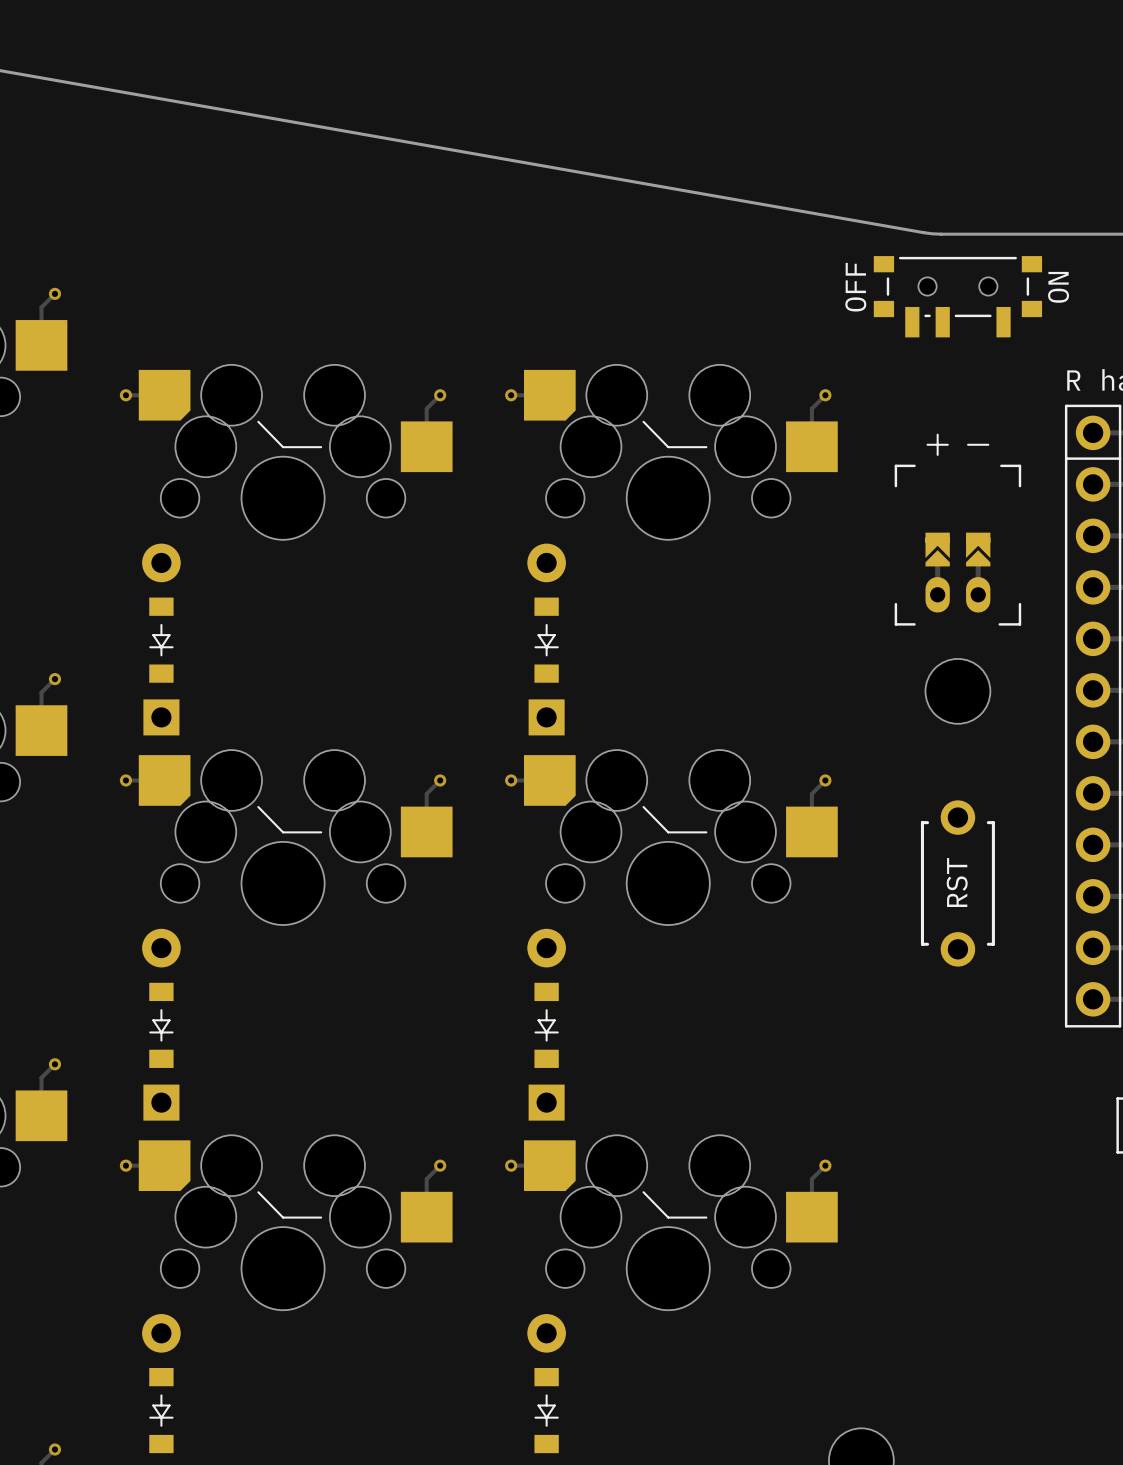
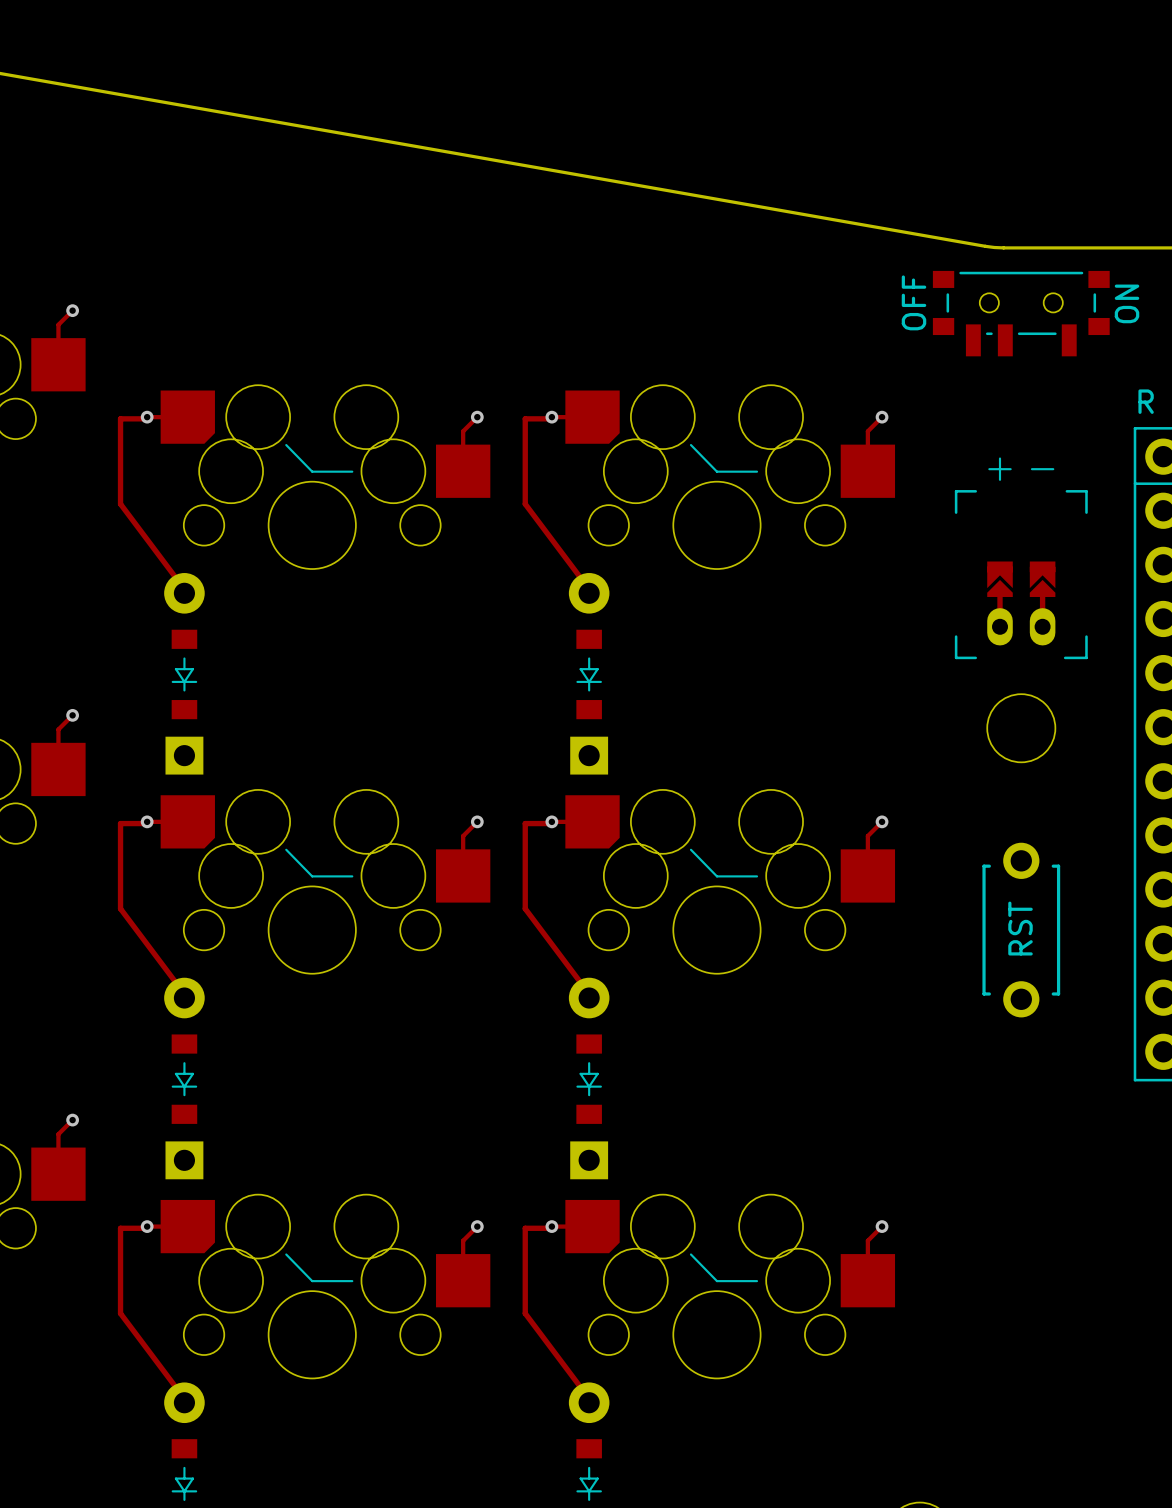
track: none -> (147, 418) (120, 418) (120, 504) (184, 589)
track: none -> (551, 418) (525, 418) (525, 504) (589, 589)
track: none -> (147, 823) (120, 823) (120, 908) (184, 993)
track: none -> (551, 823) (525, 823) (525, 908) (589, 993)
track: none -> (147, 1228) (120, 1228) (120, 1313) (184, 1398)
track: none -> (551, 1228) (525, 1228) (525, 1313) (589, 1398)

